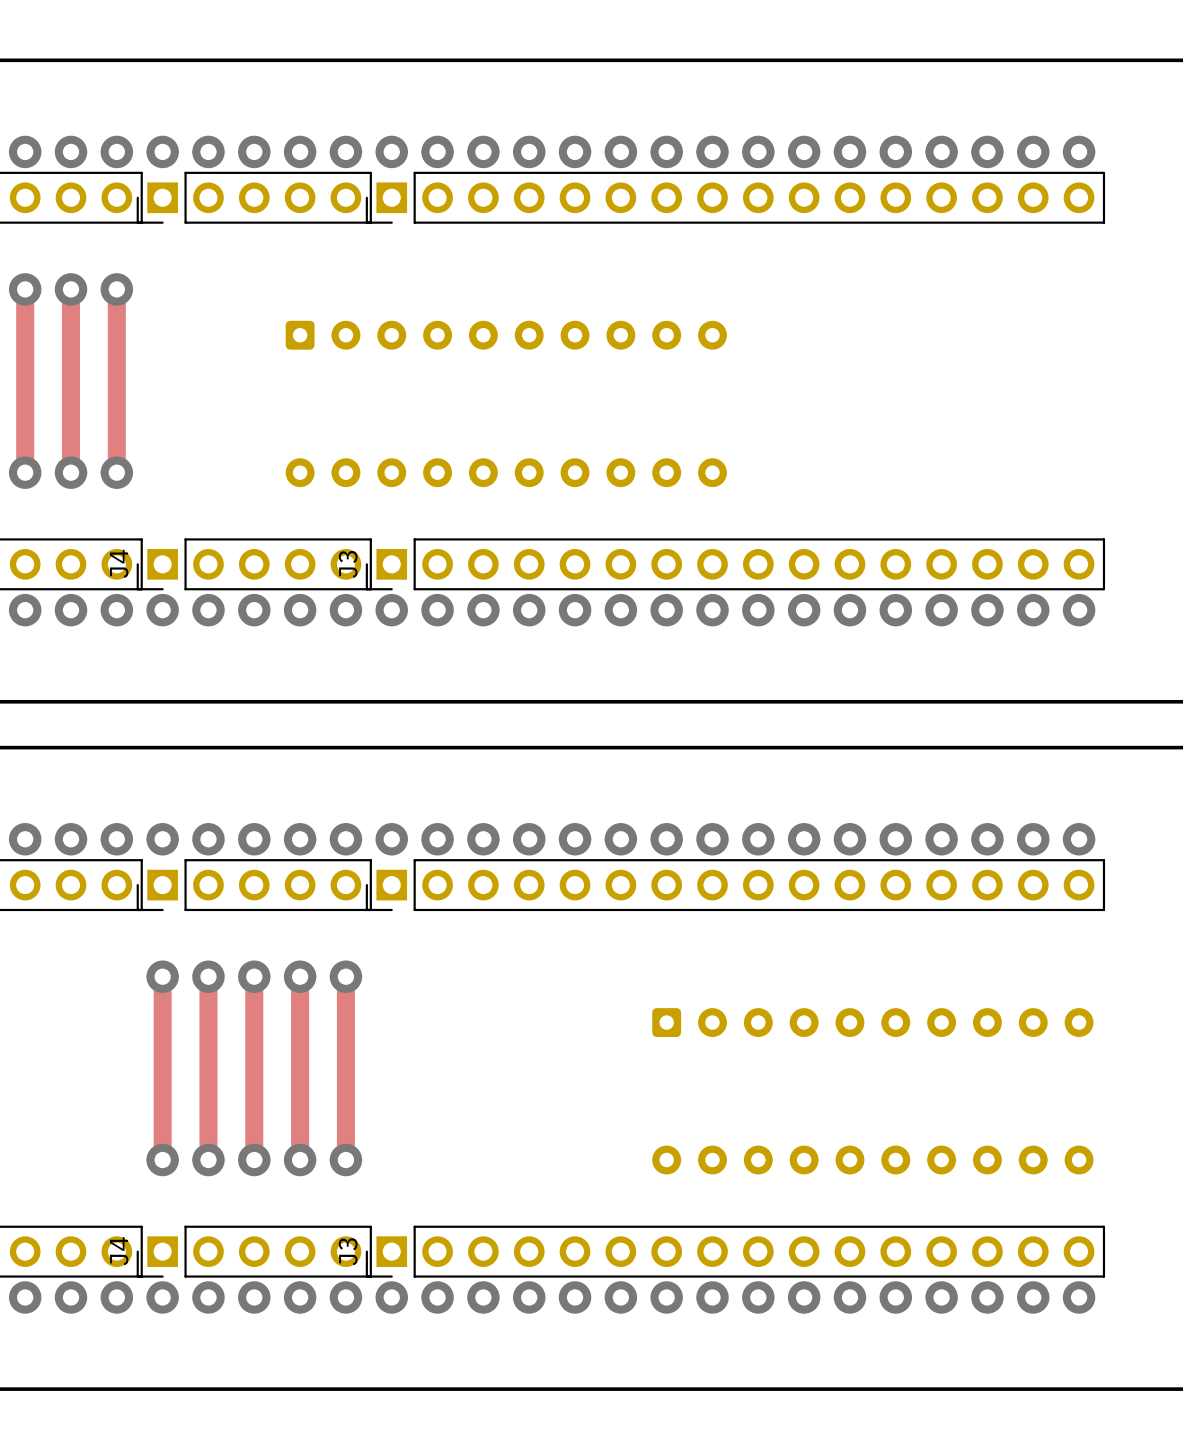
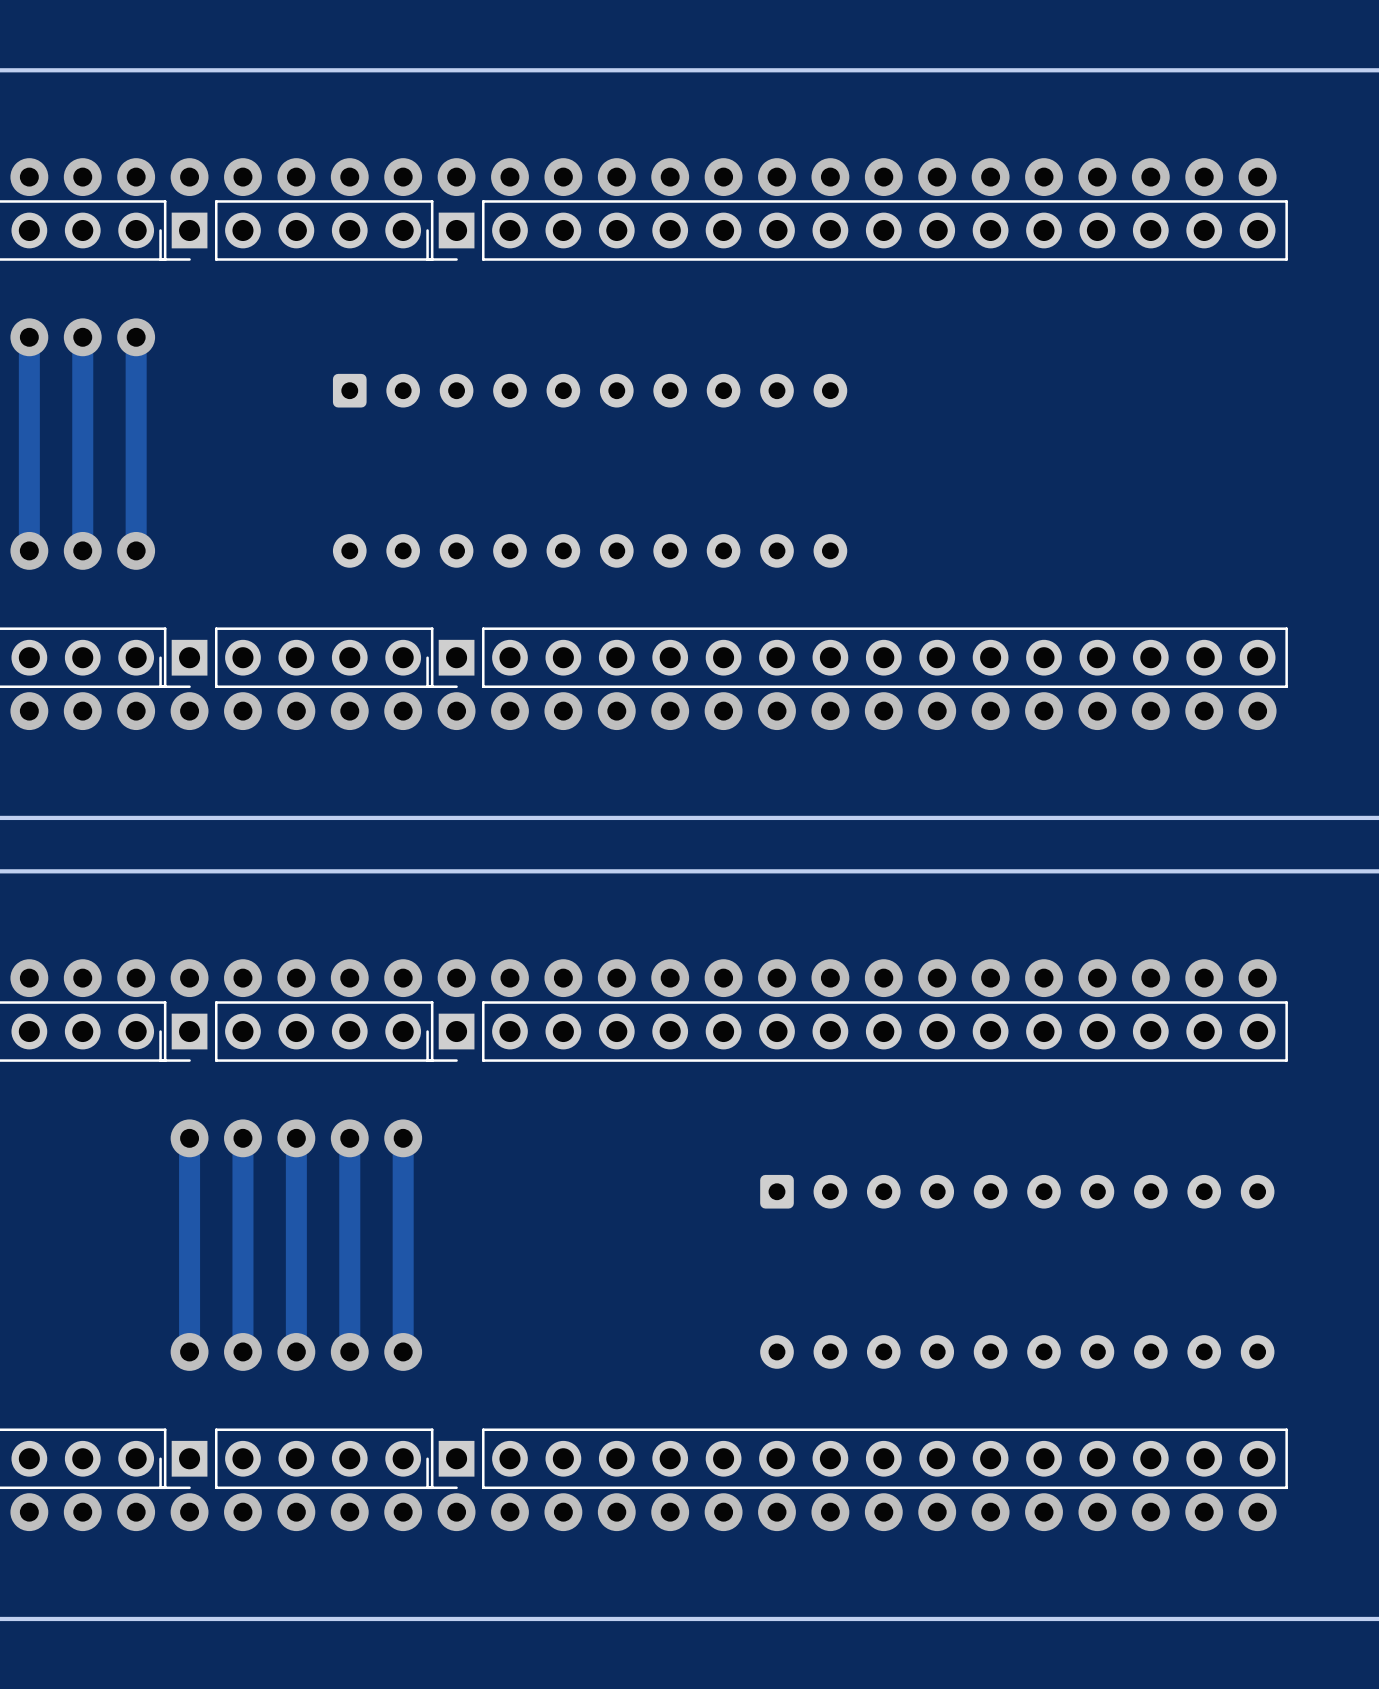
J4 name: J4 (119, 563) -> none
J3 name: J3 (348, 564) -> none
J4 name: J4 (119, 1251) -> none
J3 name: J3 (348, 1251) -> none

